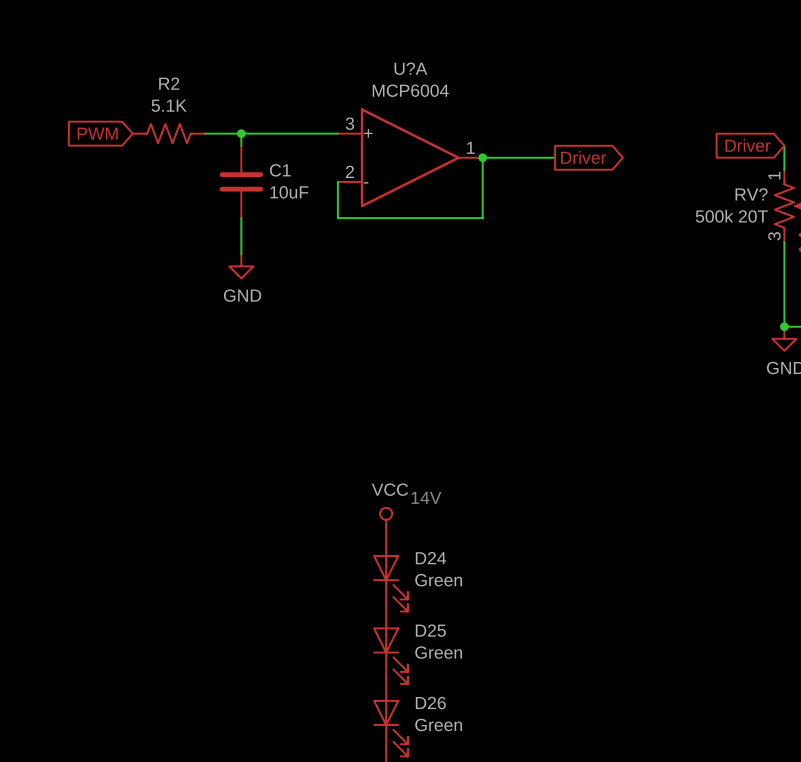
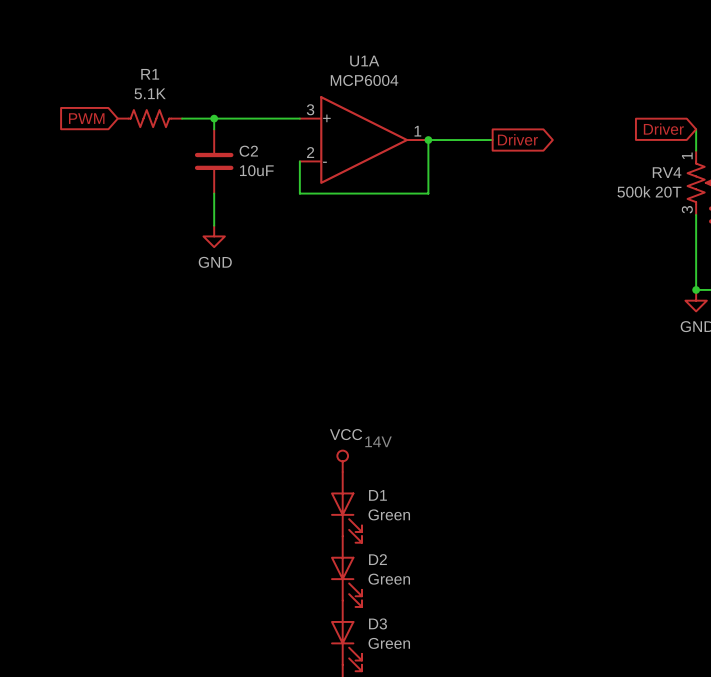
U?A name: U?A (410, 68) -> U1A (364, 61)
R2 name: R2 (169, 83) -> R1 (150, 74)
C1 name: C1 (280, 170) -> C2 (248, 151)
RV? name: RV? (751, 194) -> RV4 (667, 172)
D24 name: D24 (430, 558) -> D1 (377, 495)
D25 name: D25 (430, 630) -> D2 (377, 559)
D26 name: D26 (430, 703) -> D3 (378, 623)

